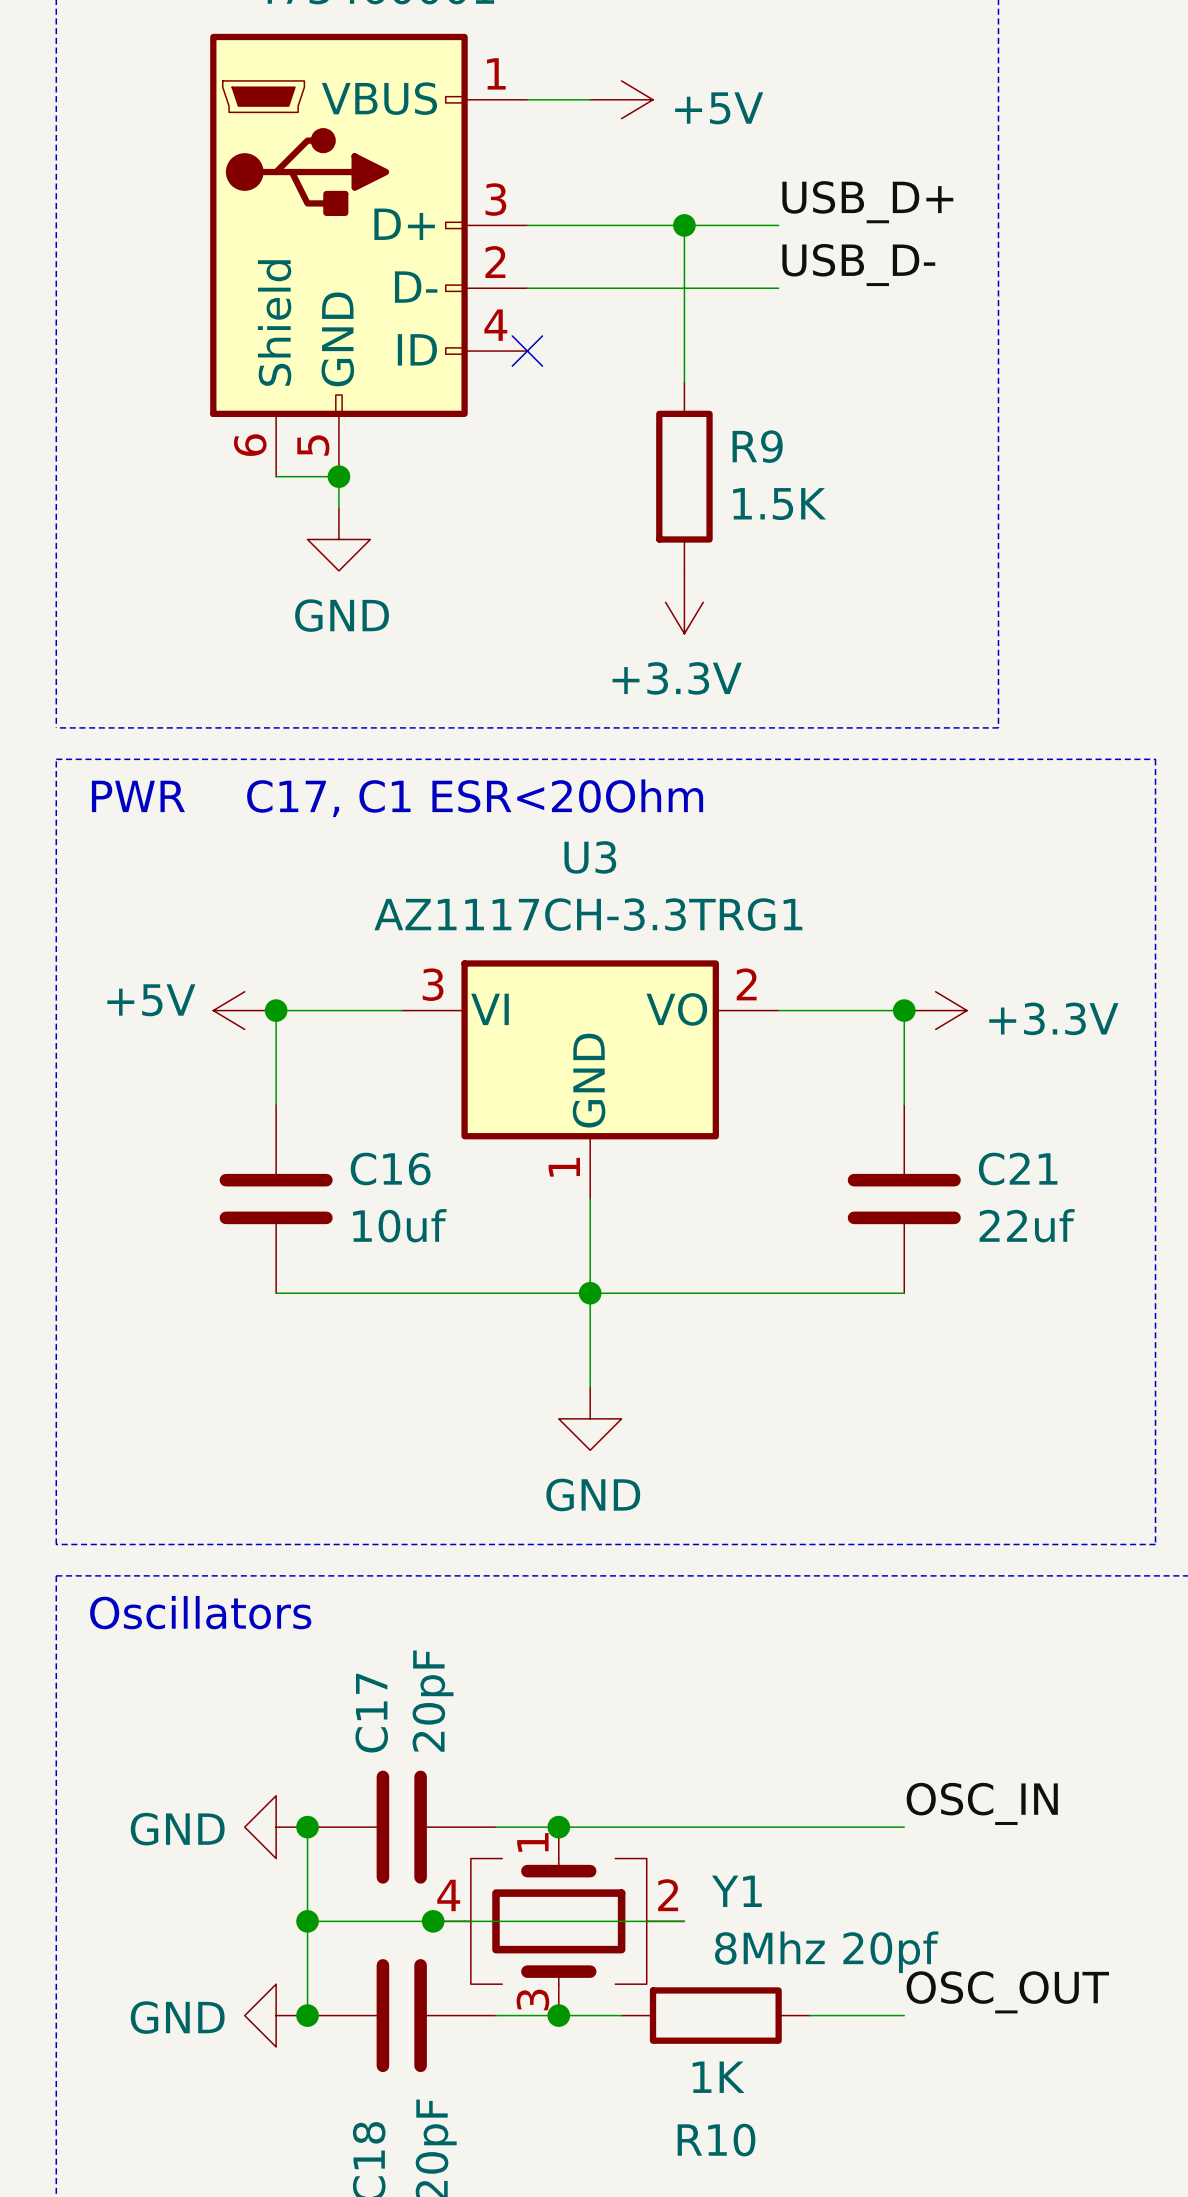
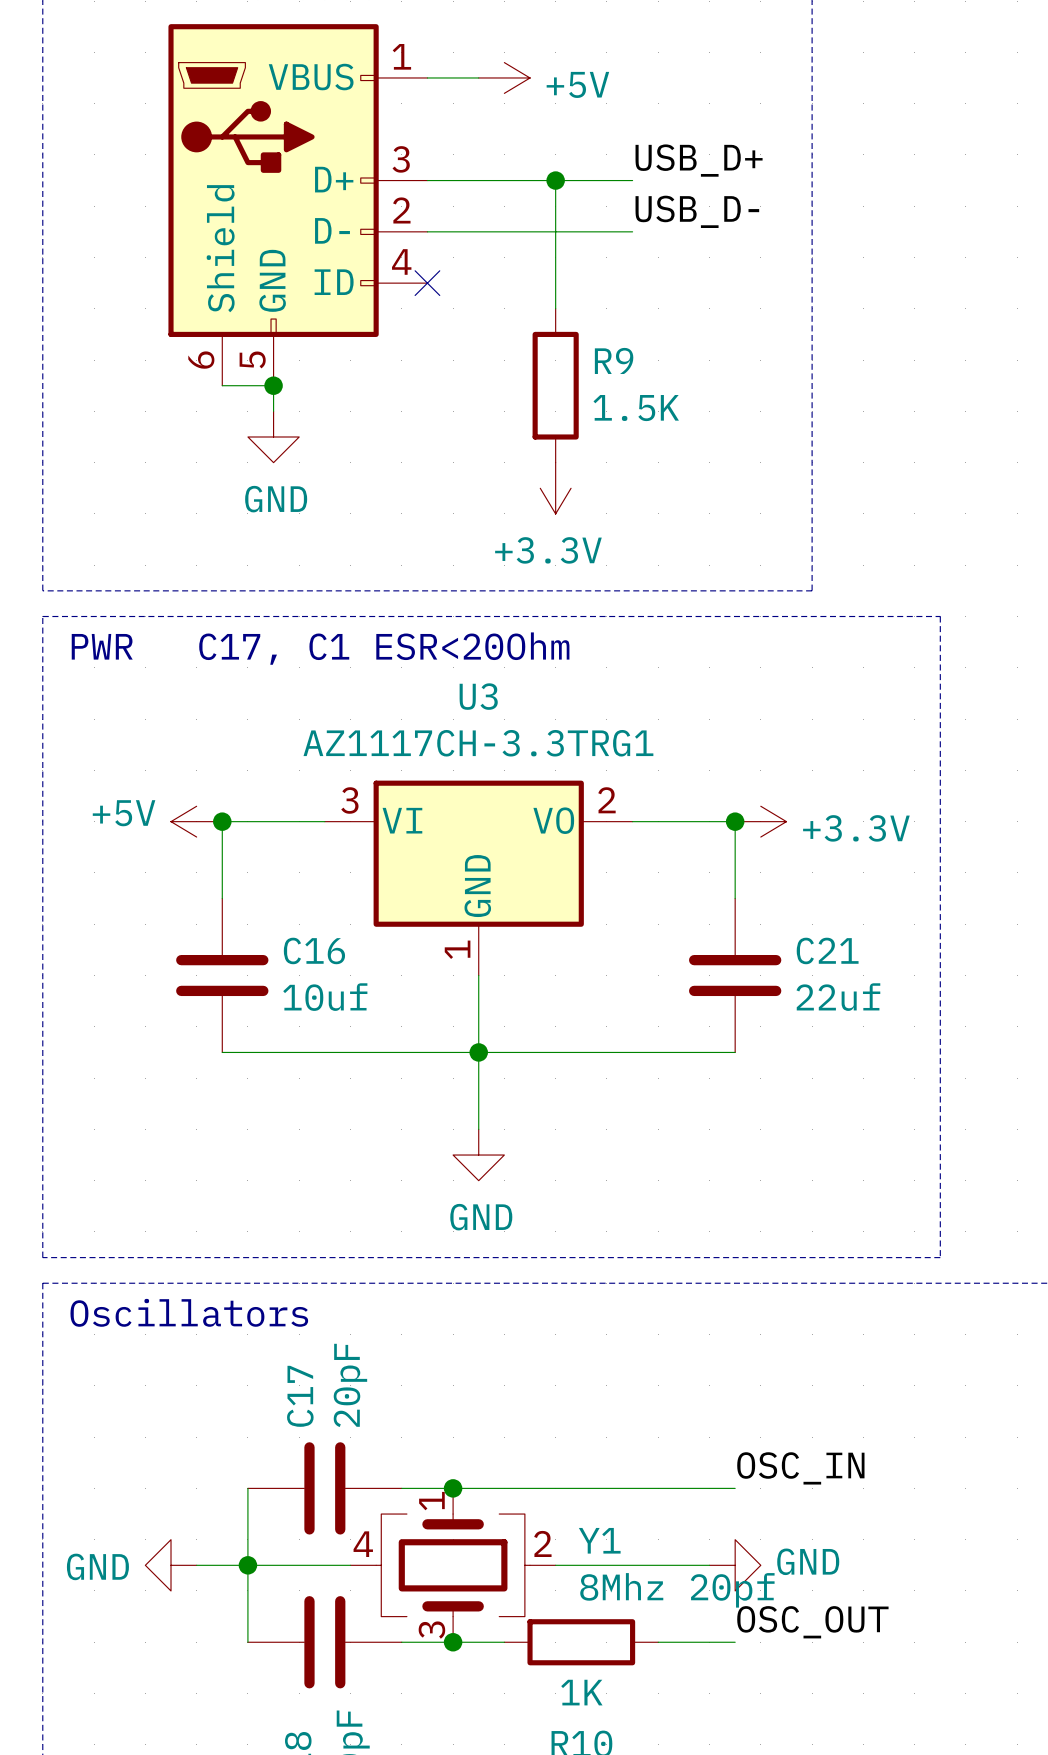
power symbol: GND (276, 1827) -> none
junction: (307, 1827) -> none
power symbol: none -> GND (171, 1565)
wire: none -> (196, 1565) (247, 1565)
wire: (433, 1921) (684, 1921) -> (709, 1565) (555, 1565)
junction: (433, 1921) -> none
power symbol: none -> GND (735, 1565)
power symbol: GND (276, 2015) -> none
junction: (307, 2015) -> none

